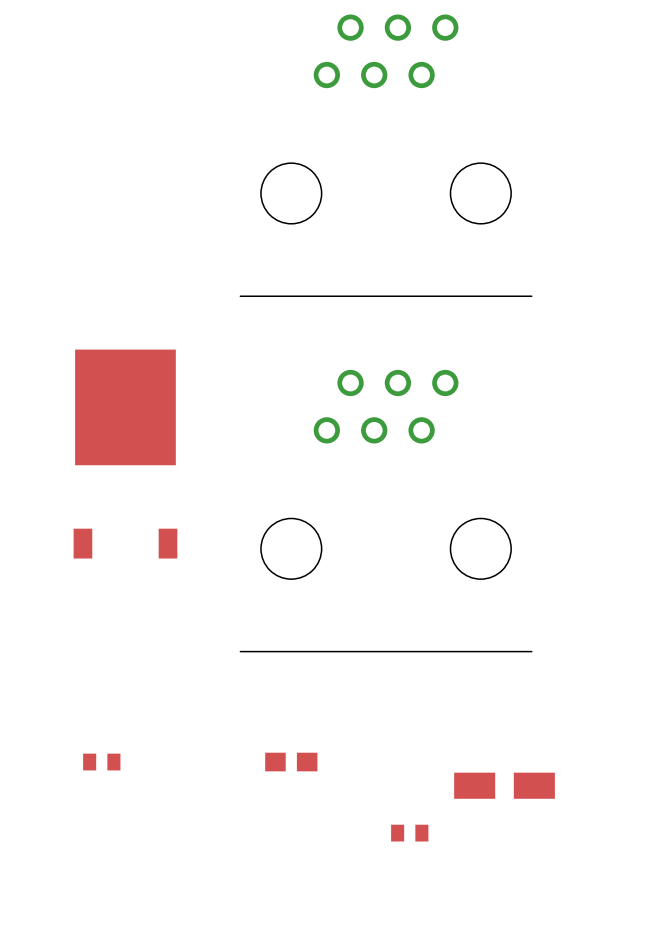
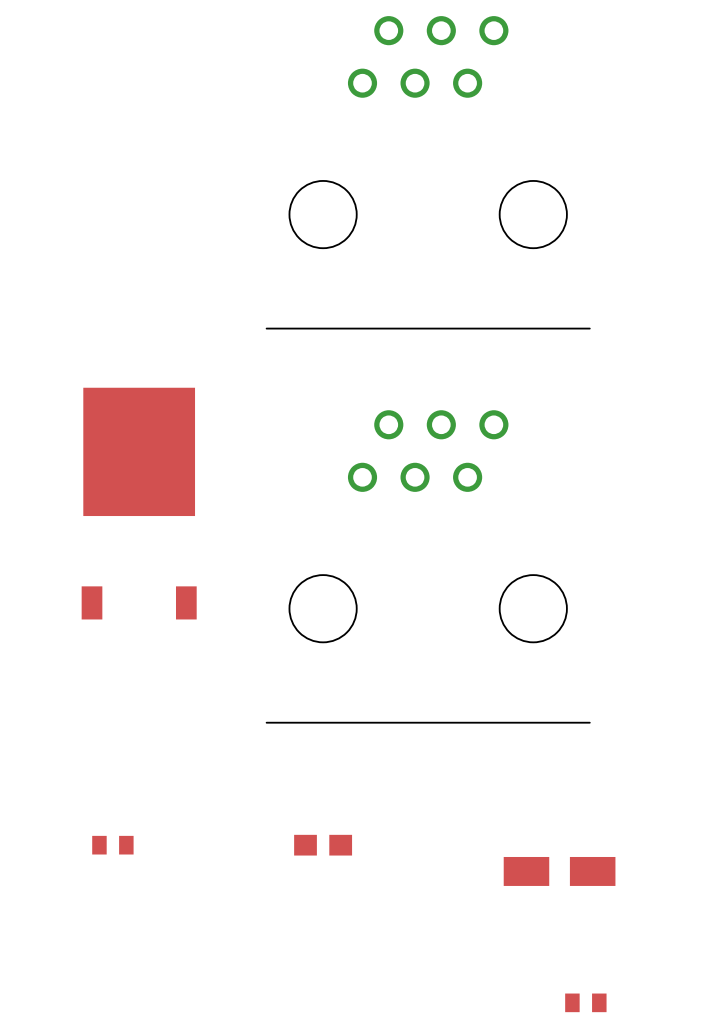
part position: (409, 833) -> (585, 1002)

